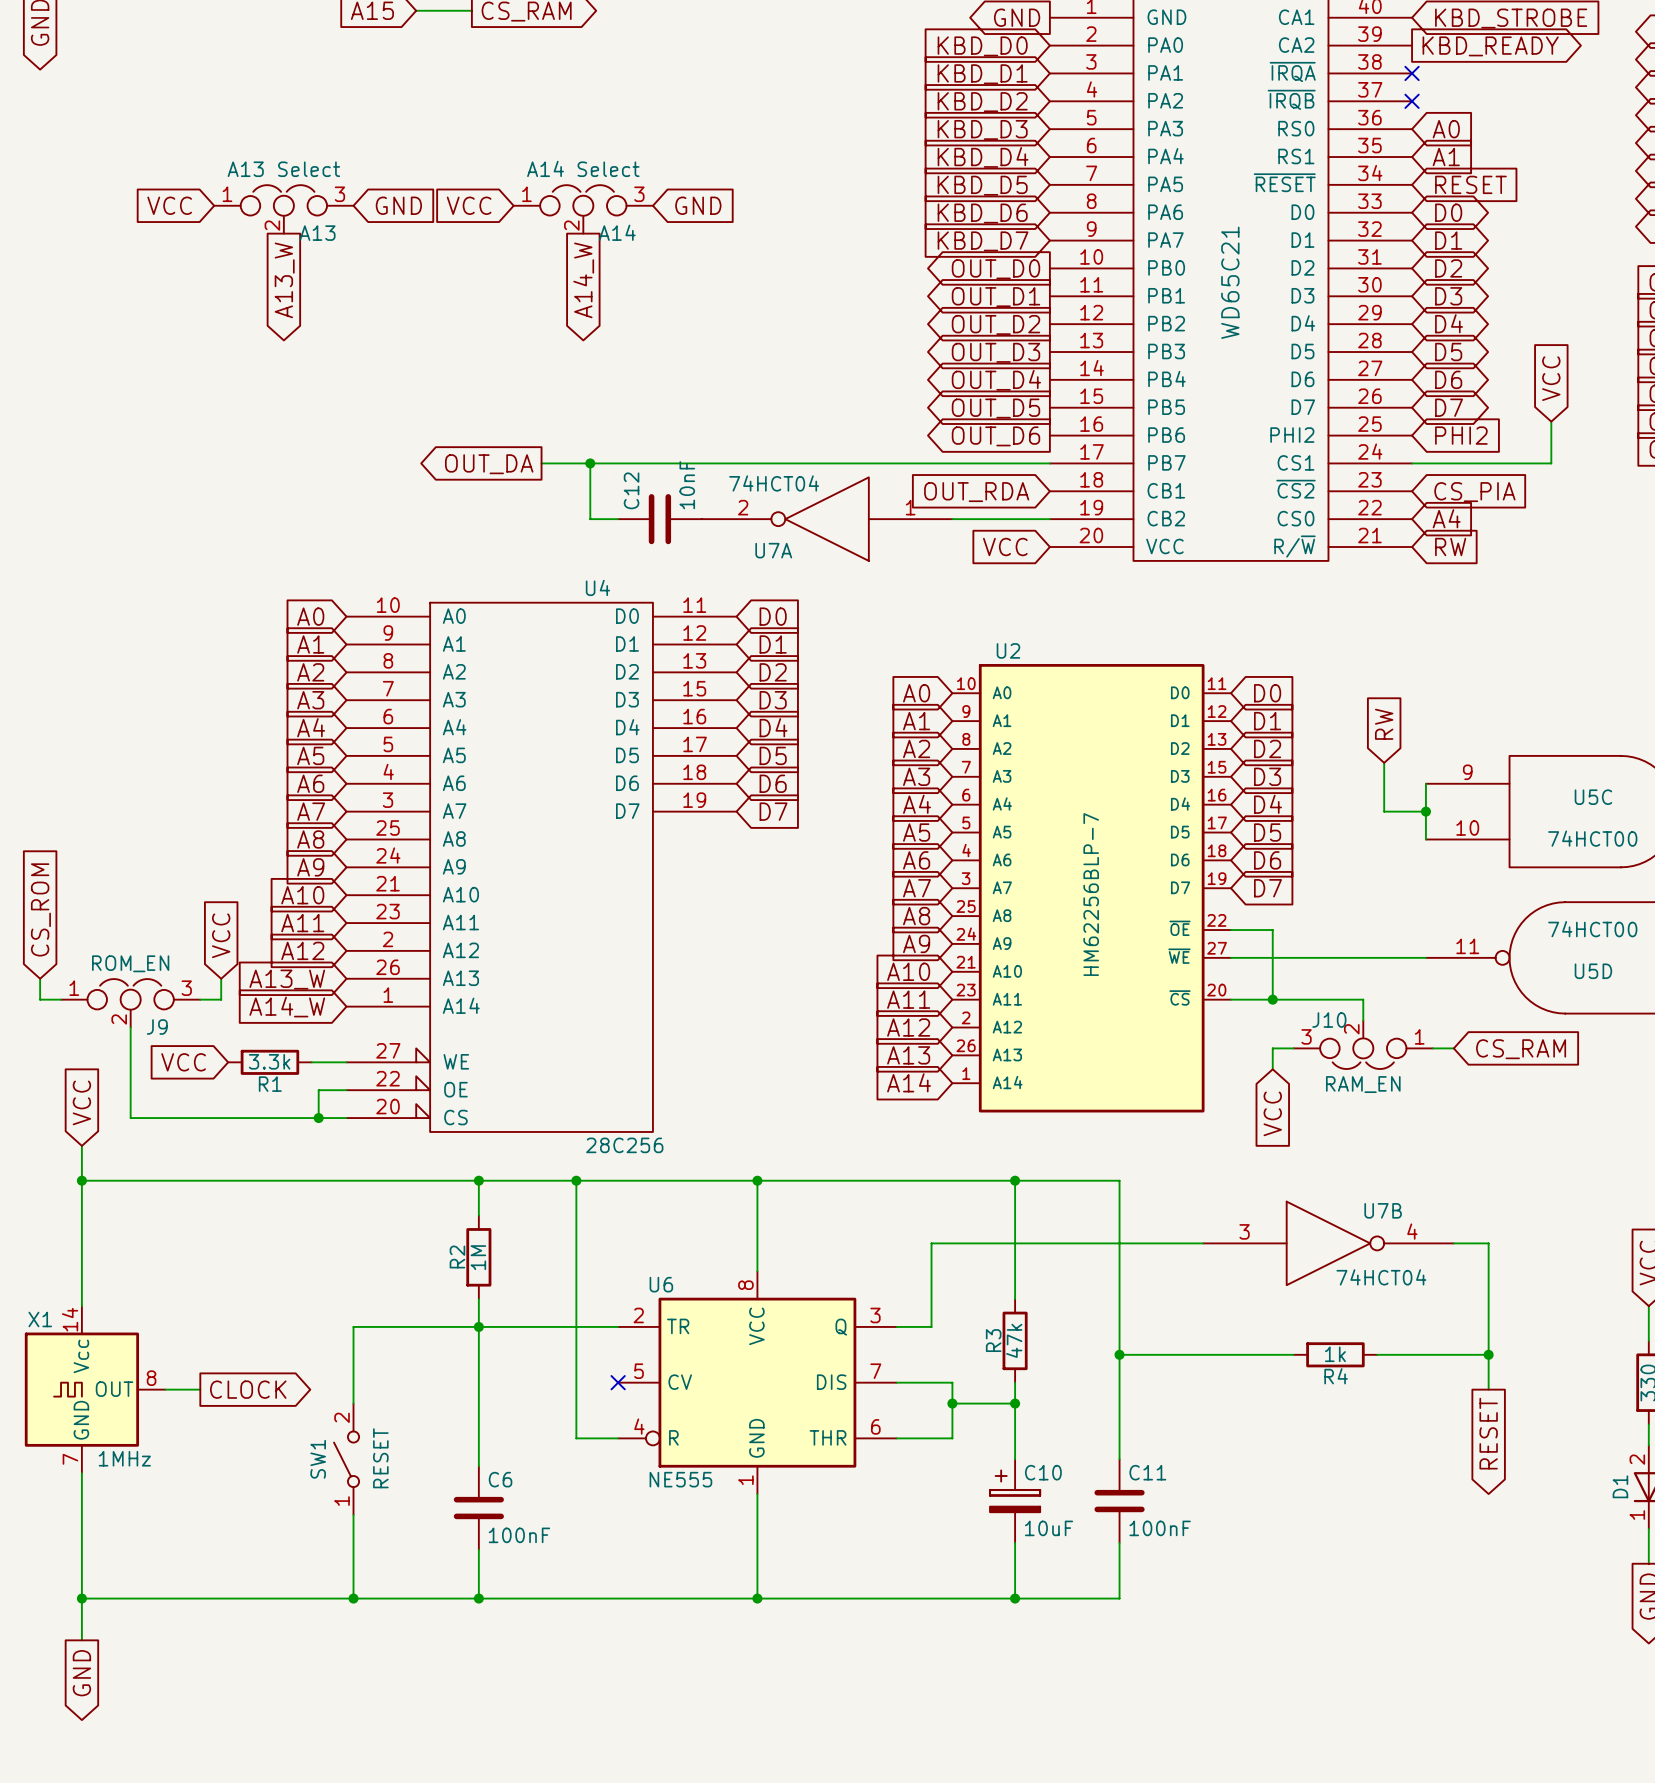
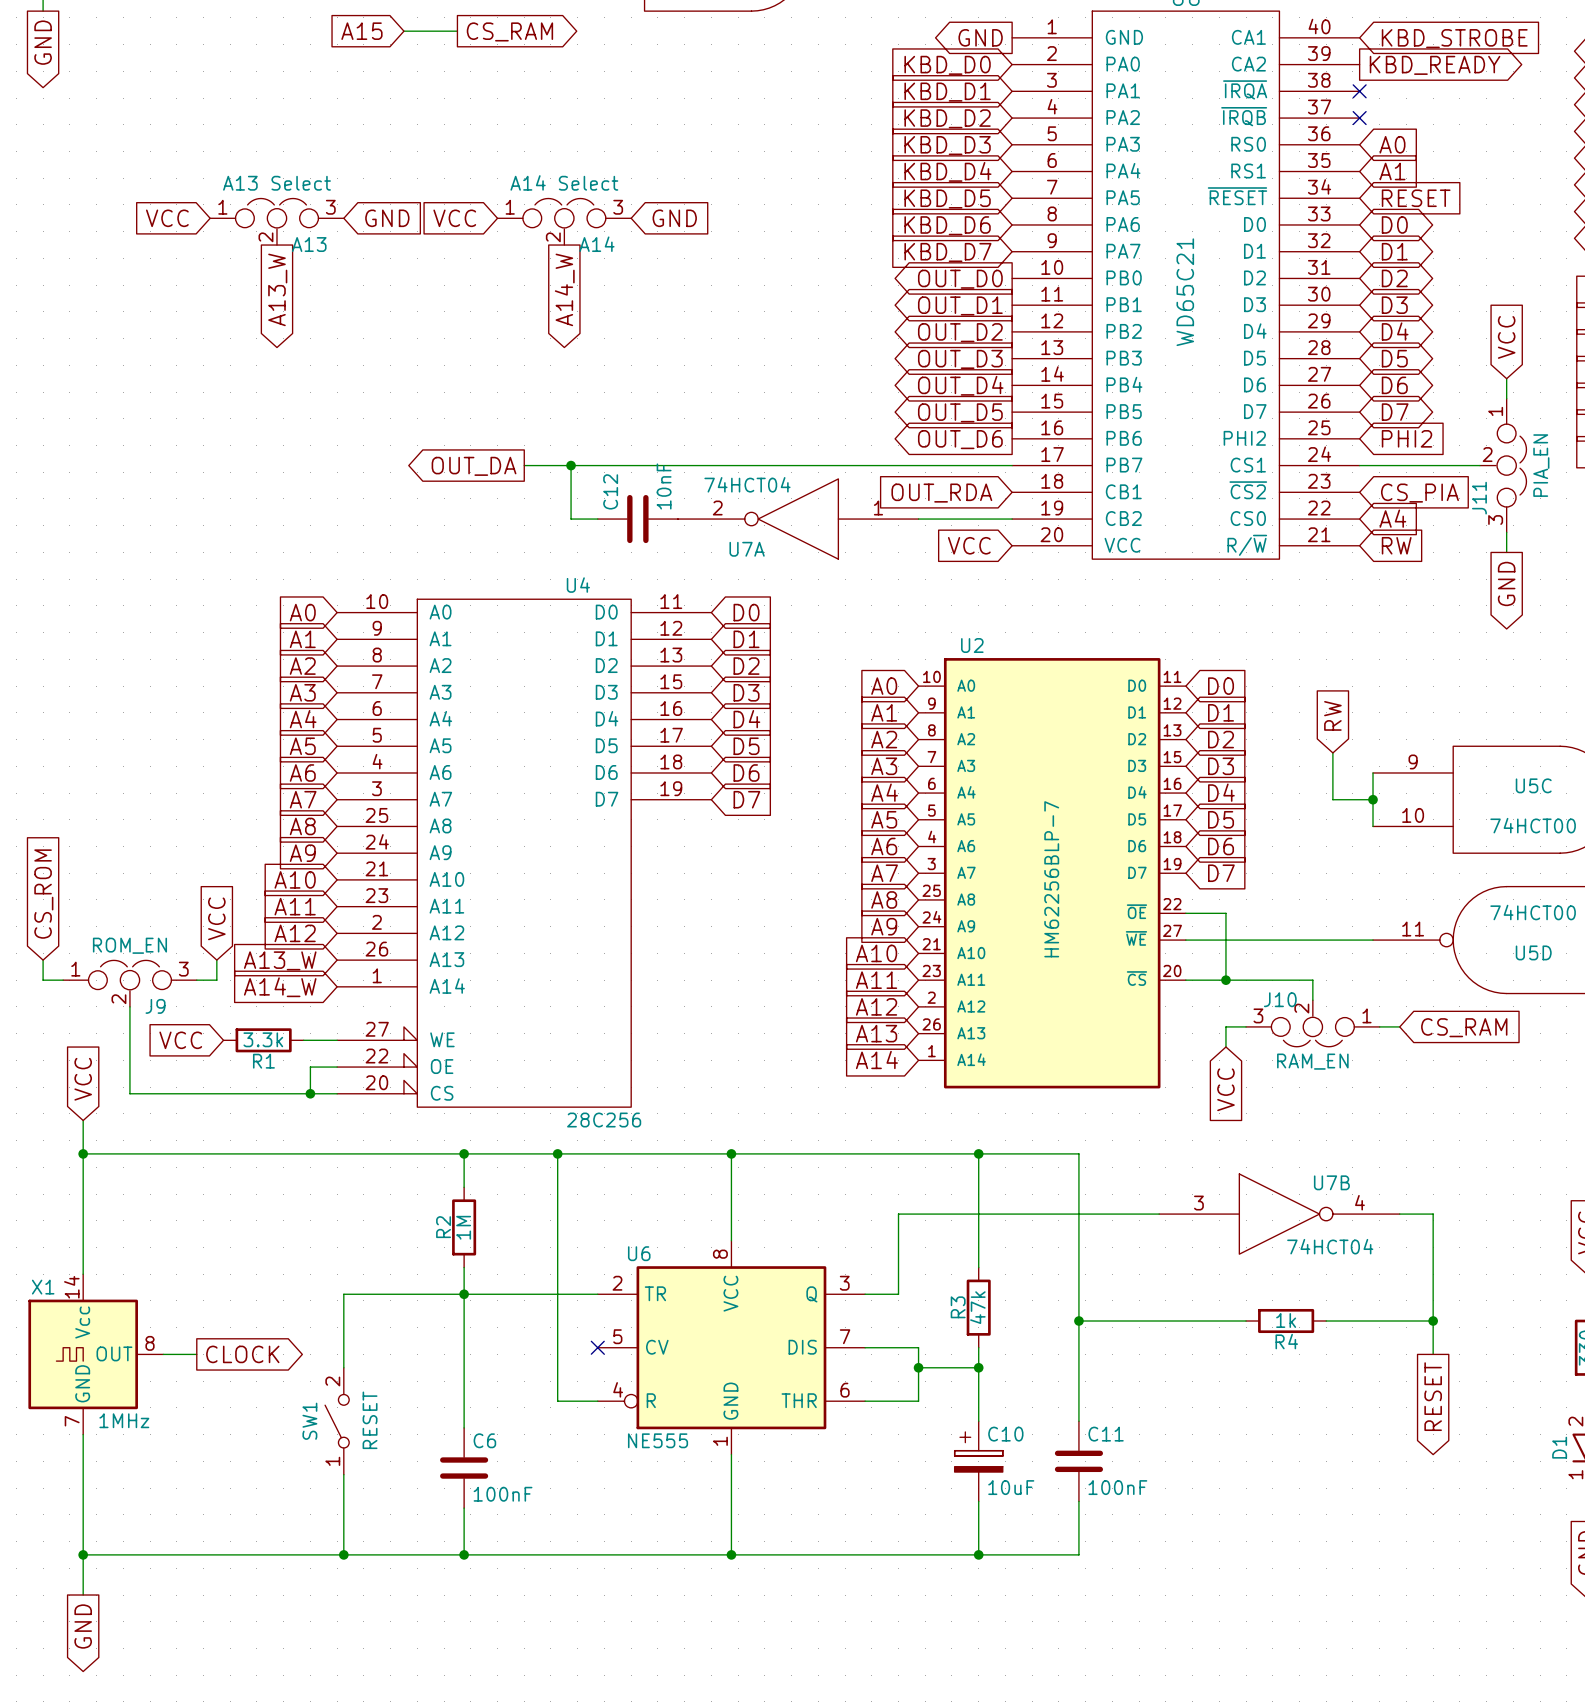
wire: none -> (1506, 378) (1506, 398)
global label position: VCC (1551, 378) -> VCC (1506, 337)
wire: (1551, 421) (1551, 463) (1537, 463) -> none
J11: none -> PIA_EN (1503, 465)
wire: none -> (1506, 532) (1506, 552)
global label: none -> GND (1506, 583)

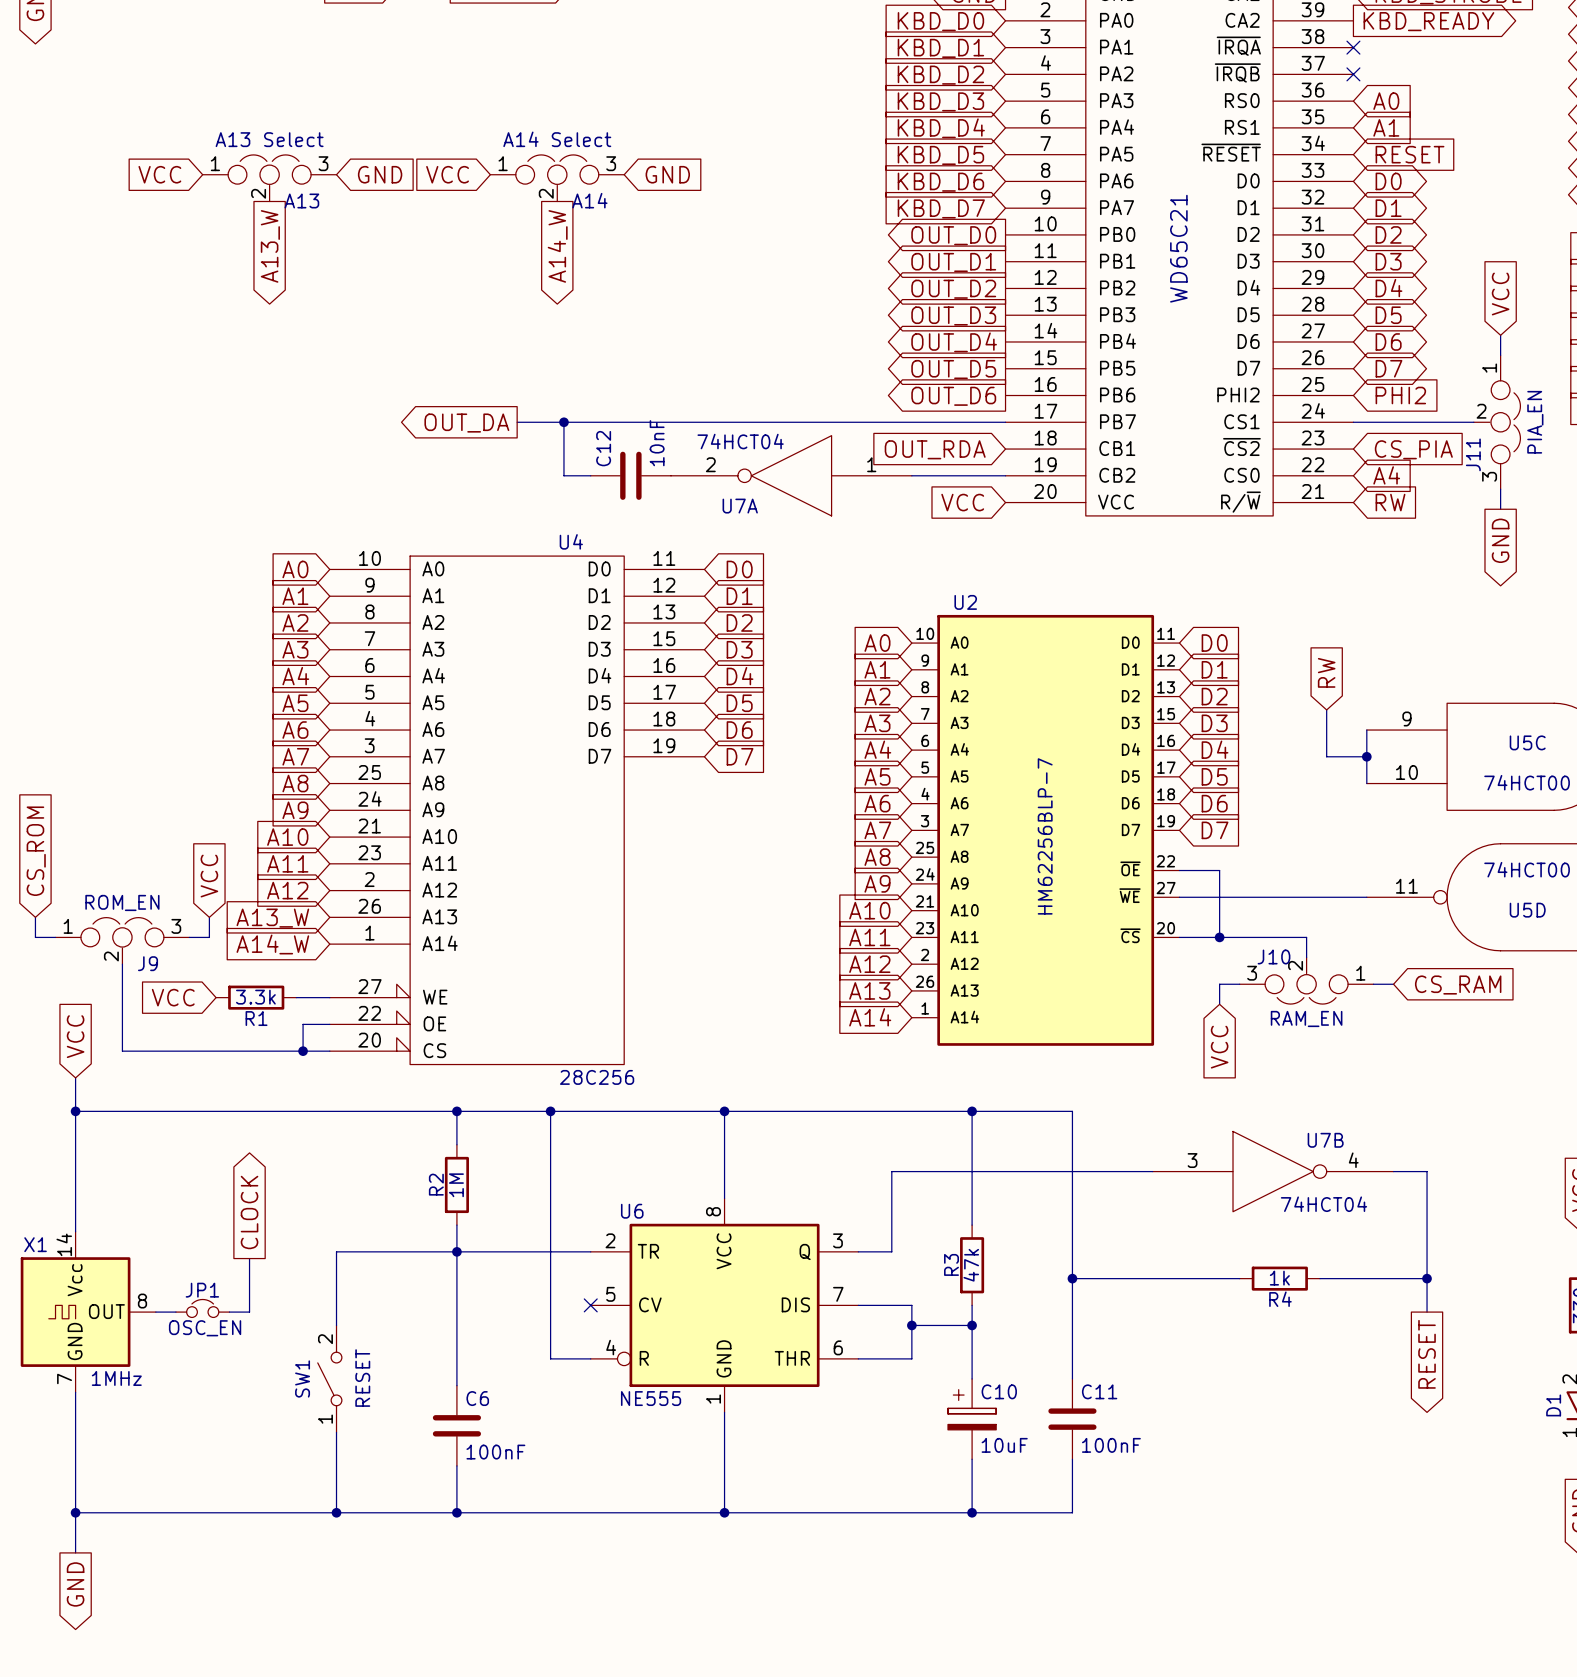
wire: none -> (249, 1258) (249, 1312) (229, 1312)
JP1: none -> OSC_EN (202, 1308)
global label rotation: 0° (242, 1354) -> 90° counterclockwise (249, 1212)

